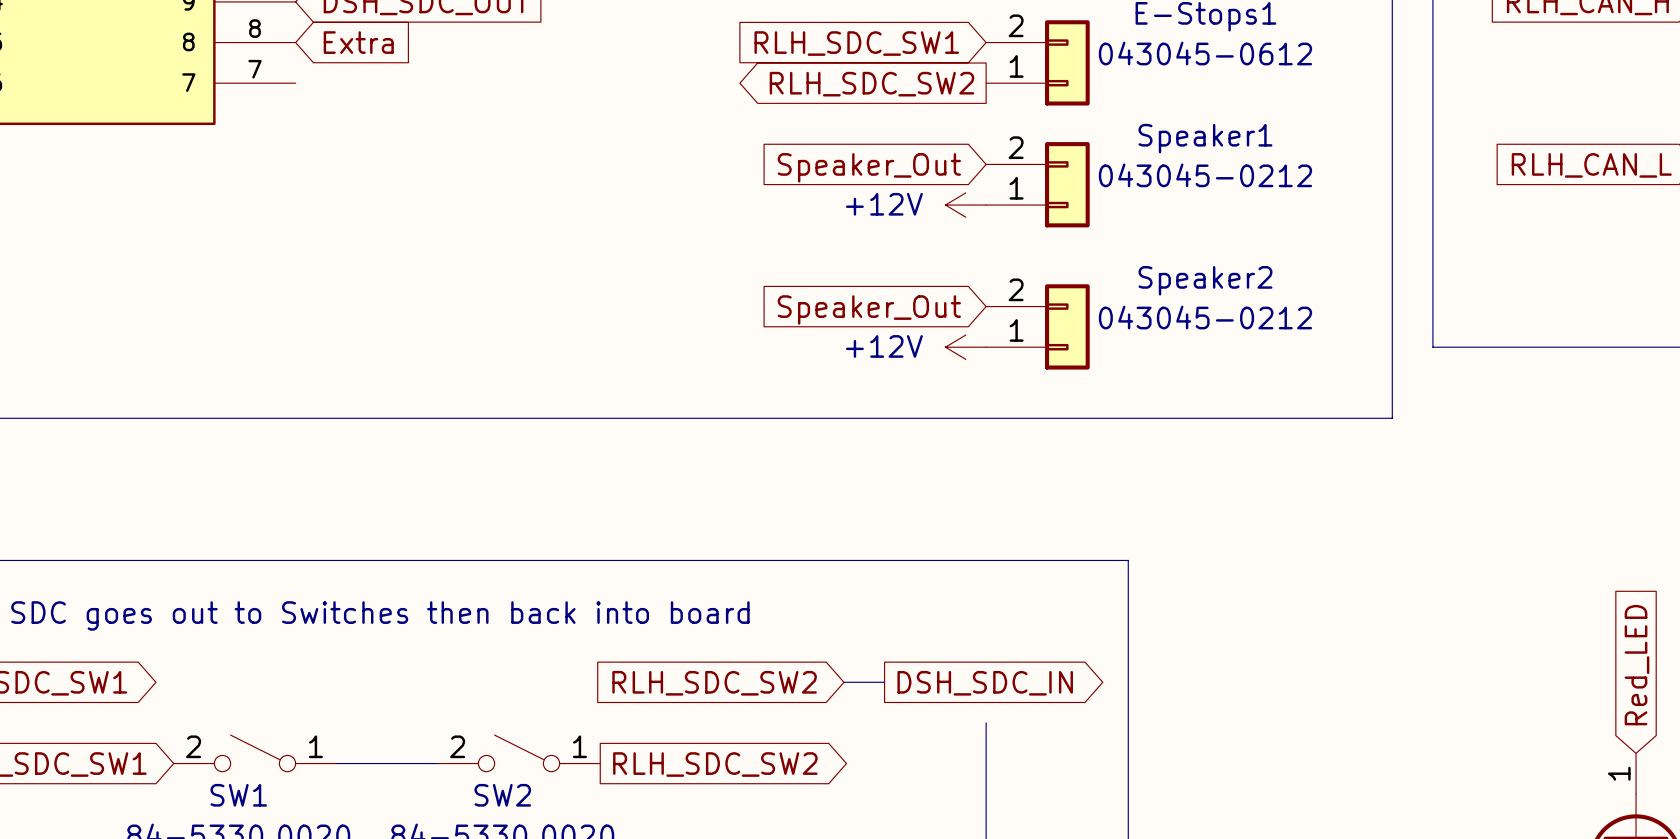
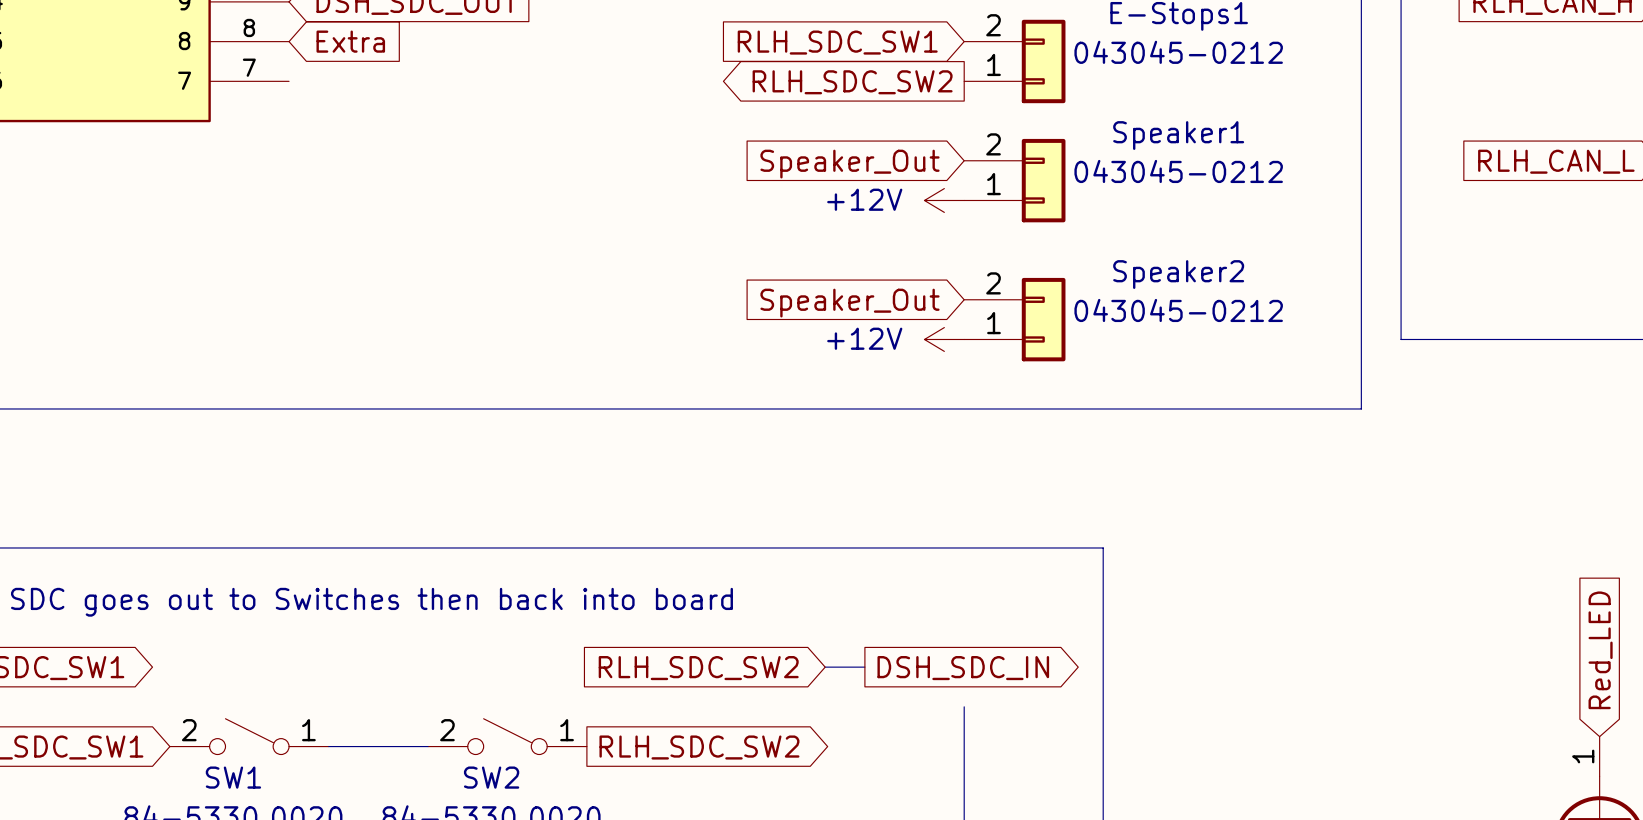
E-Stops1 value: 043045-0612 (1205, 53) -> 043045-0212 (1178, 52)

